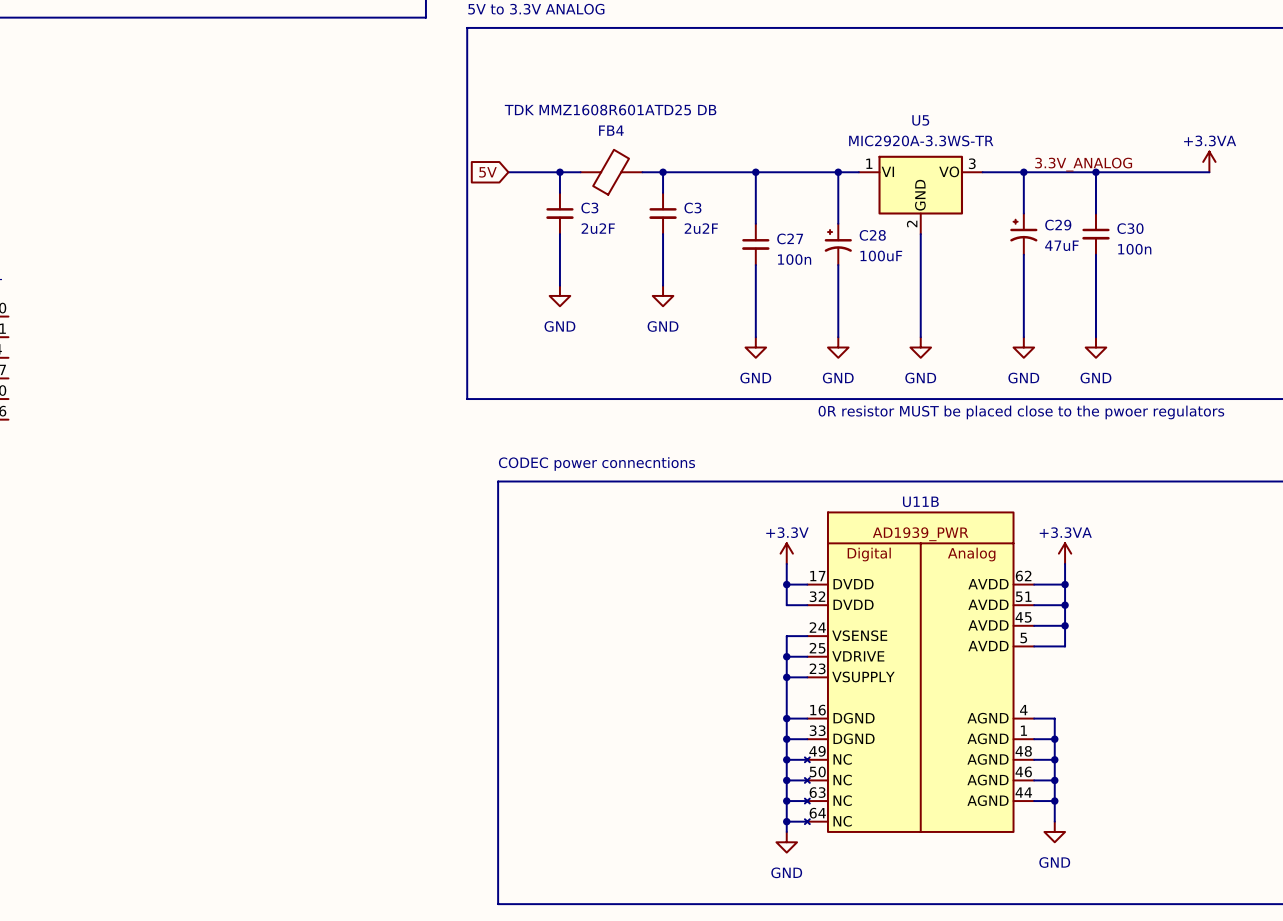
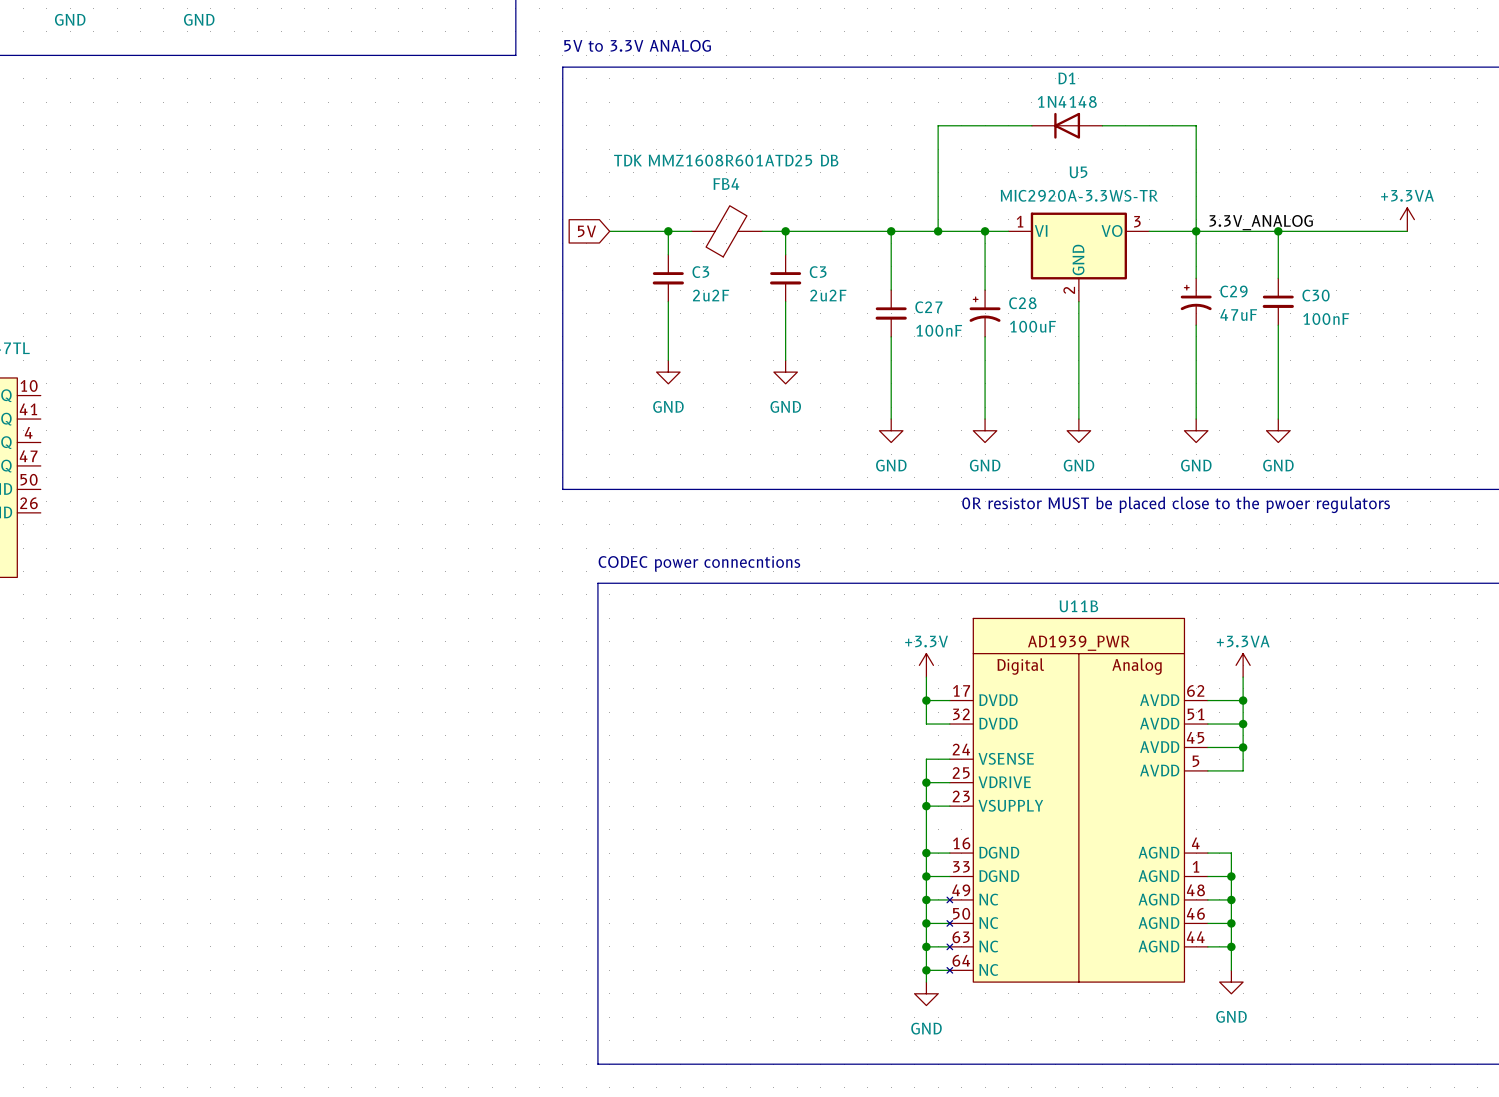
wire: none -> (1031, 125) (938, 125) (938, 231)
D1: none -> 1N4148 (1067, 125)
wire: none -> (1102, 125) (1196, 125) (1196, 231)
junction: none -> (938, 231)
C30 value: 100n (1134, 249) -> 100nF (1326, 319)
C27 value: 100n (794, 259) -> 100nF (939, 330)

